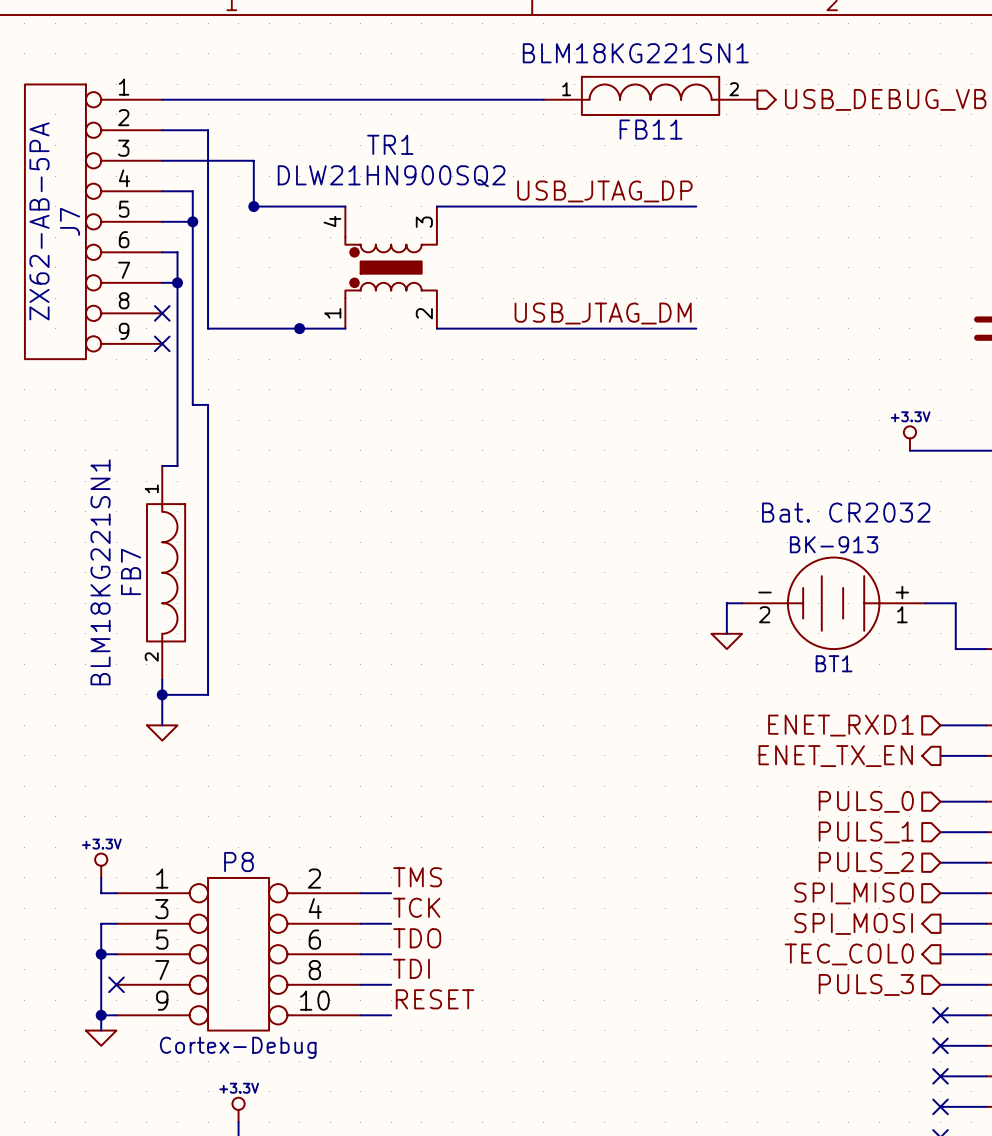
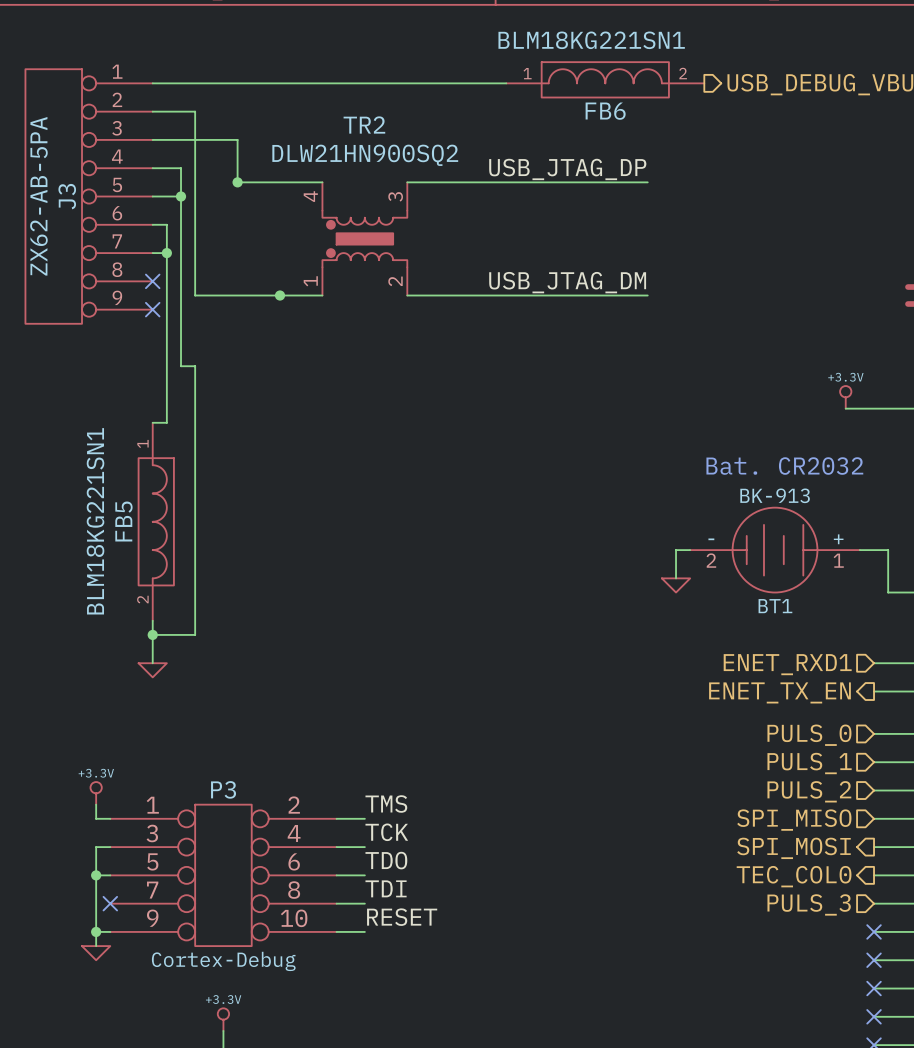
FB11 name: FB11 (651, 129) -> FB6 (605, 111)
TR1 name: TR1 (390, 144) -> TR2 (364, 125)
J7 name: J7 (70, 221) -> J3 (67, 196)
FB7 name: FB7 (131, 571) -> FB5 (123, 521)
P8 name: P8 (238, 862) -> P3 (223, 789)

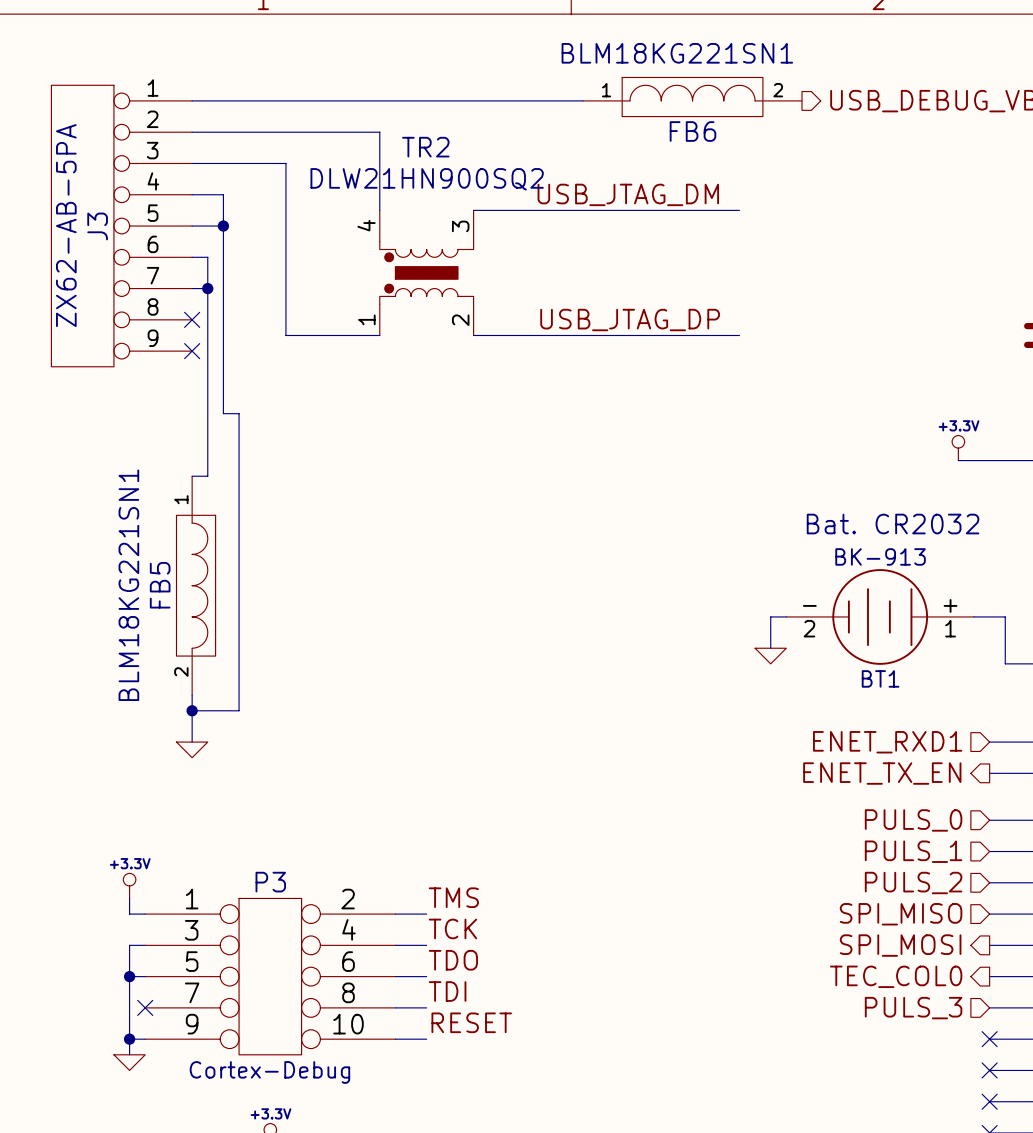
wire: (195, 111) (195, 295) (237, 295) -> (285, 210) (285, 335)
label position: USB_JTAG_DP (567, 169) -> USB_JTAG_DP (630, 320)
wire: (237, 182) (322, 182) -> (239, 132) (379, 132) (379, 210)
junction: (237, 182) -> none
label position: USB_JTAG_DM (567, 282) -> USB_JTAG_DM (628, 194)
junction: (280, 295) -> none

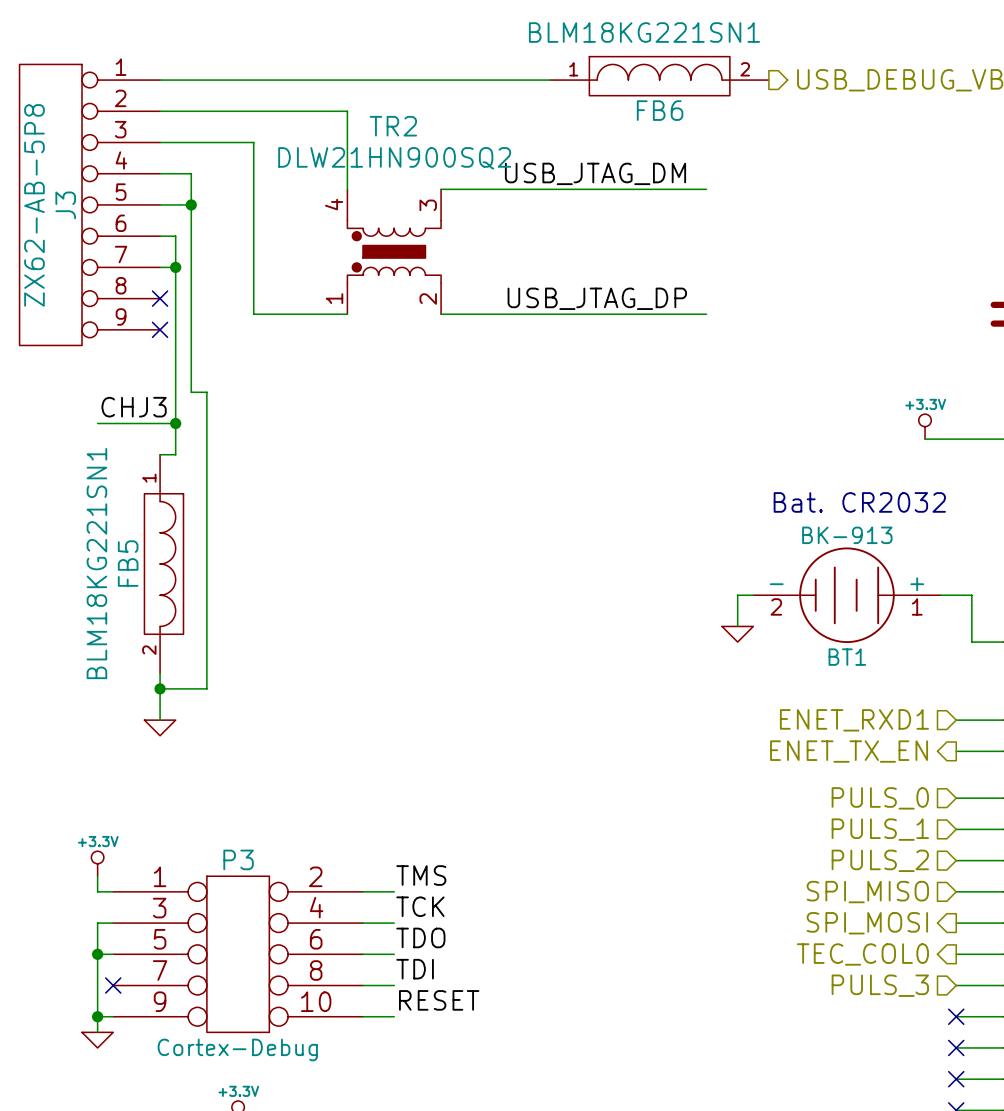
J3 value: ZX62-AB-5PA (66, 225) -> ZX62-AB-5P8 (34, 205)
label: none -> CHJ3 (134, 407)
wire: none -> (97, 423) (175, 423)
junction: none -> (175, 423)

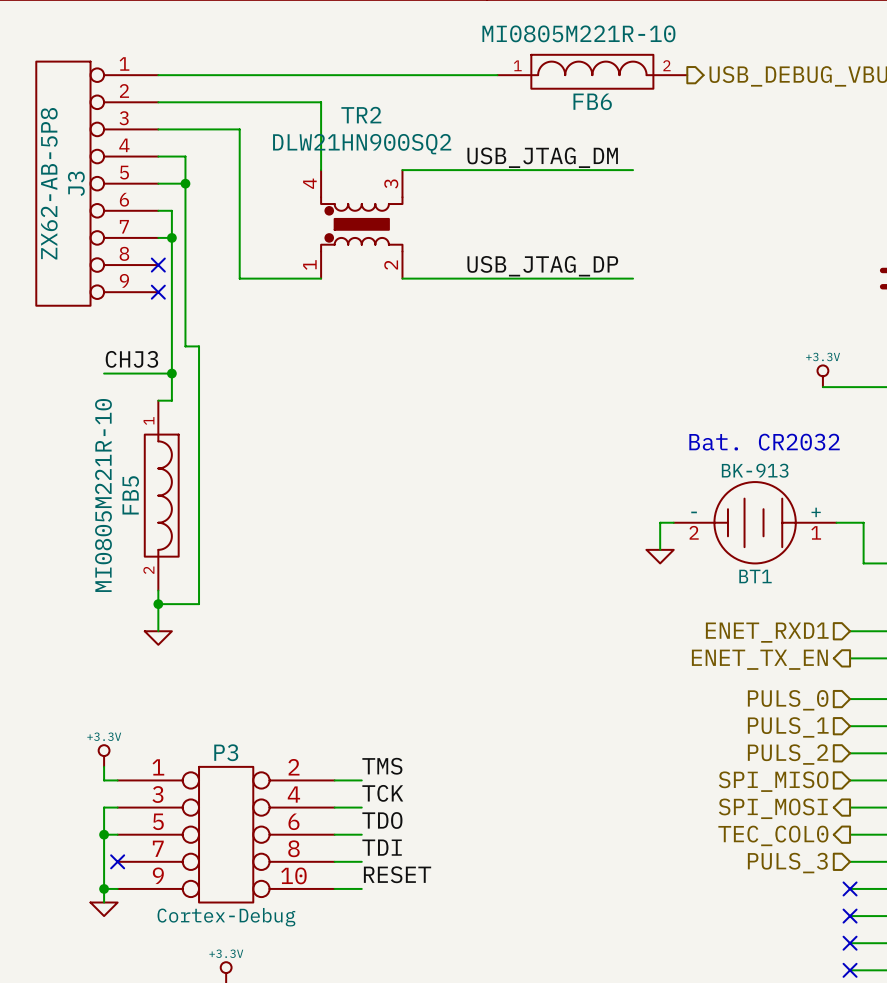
FB6 value: BLM18KG221SN1 (644, 32) -> MI0805M221R-10 (578, 33)
FB5 value: BLM18KG221SN1 (96, 563) -> MI0805M221R-10 (103, 495)

